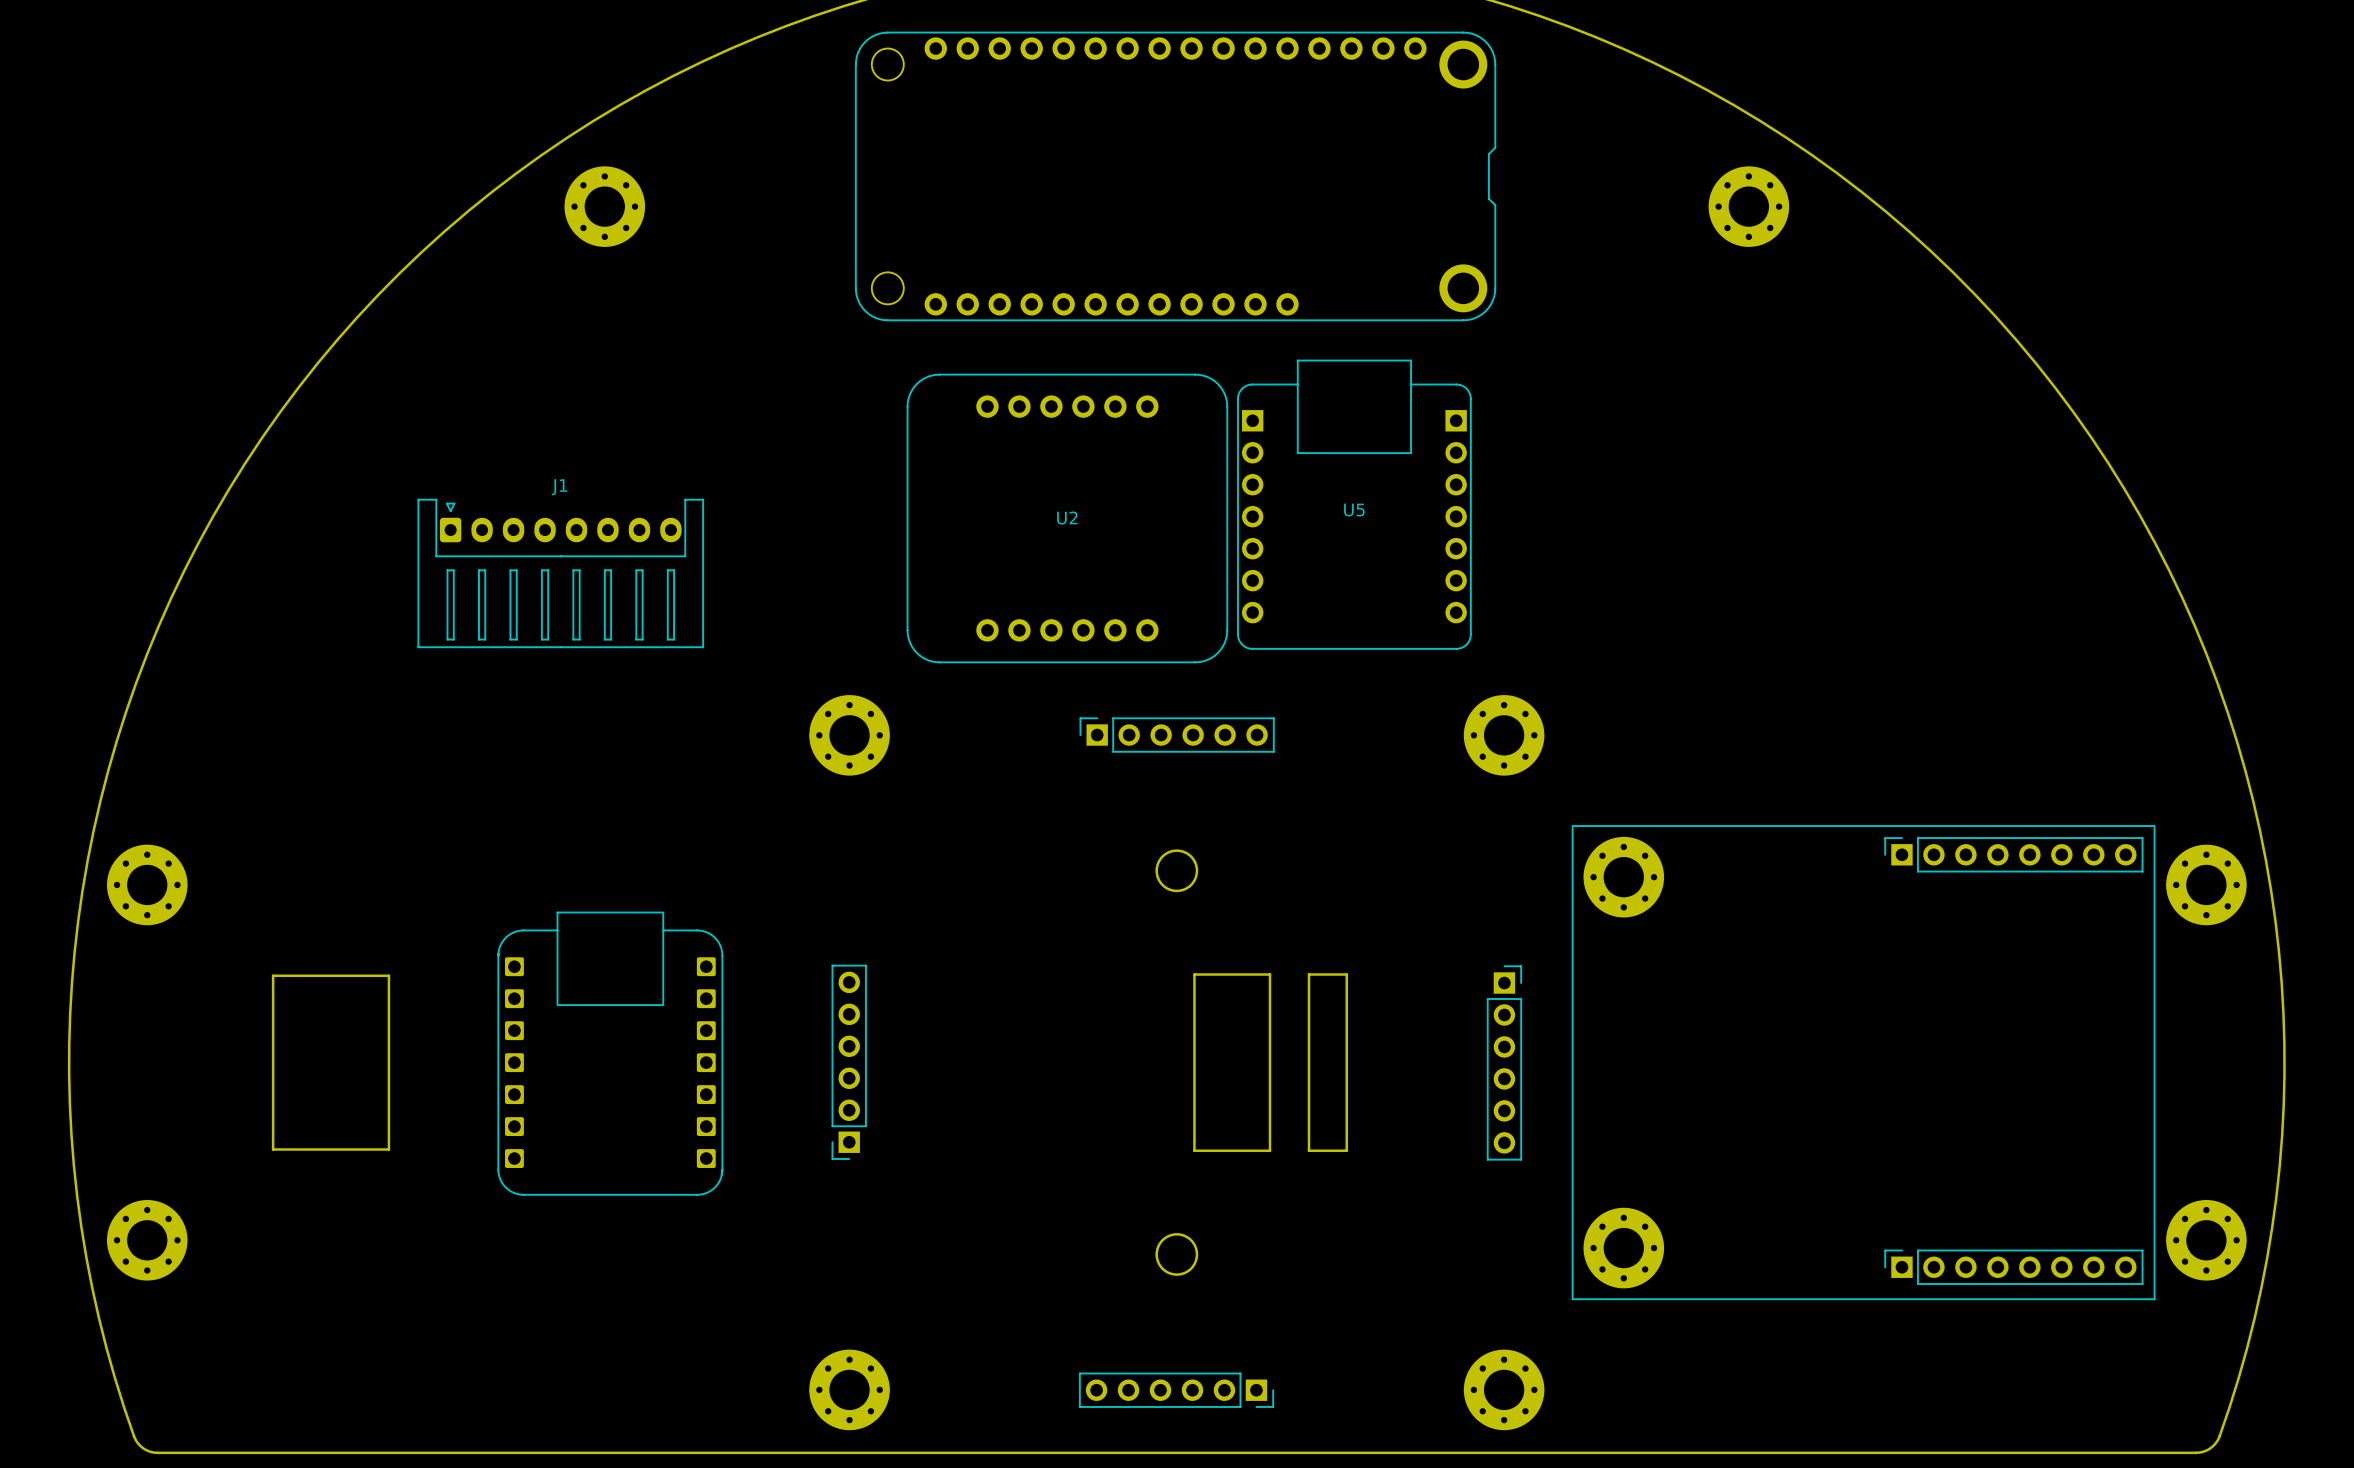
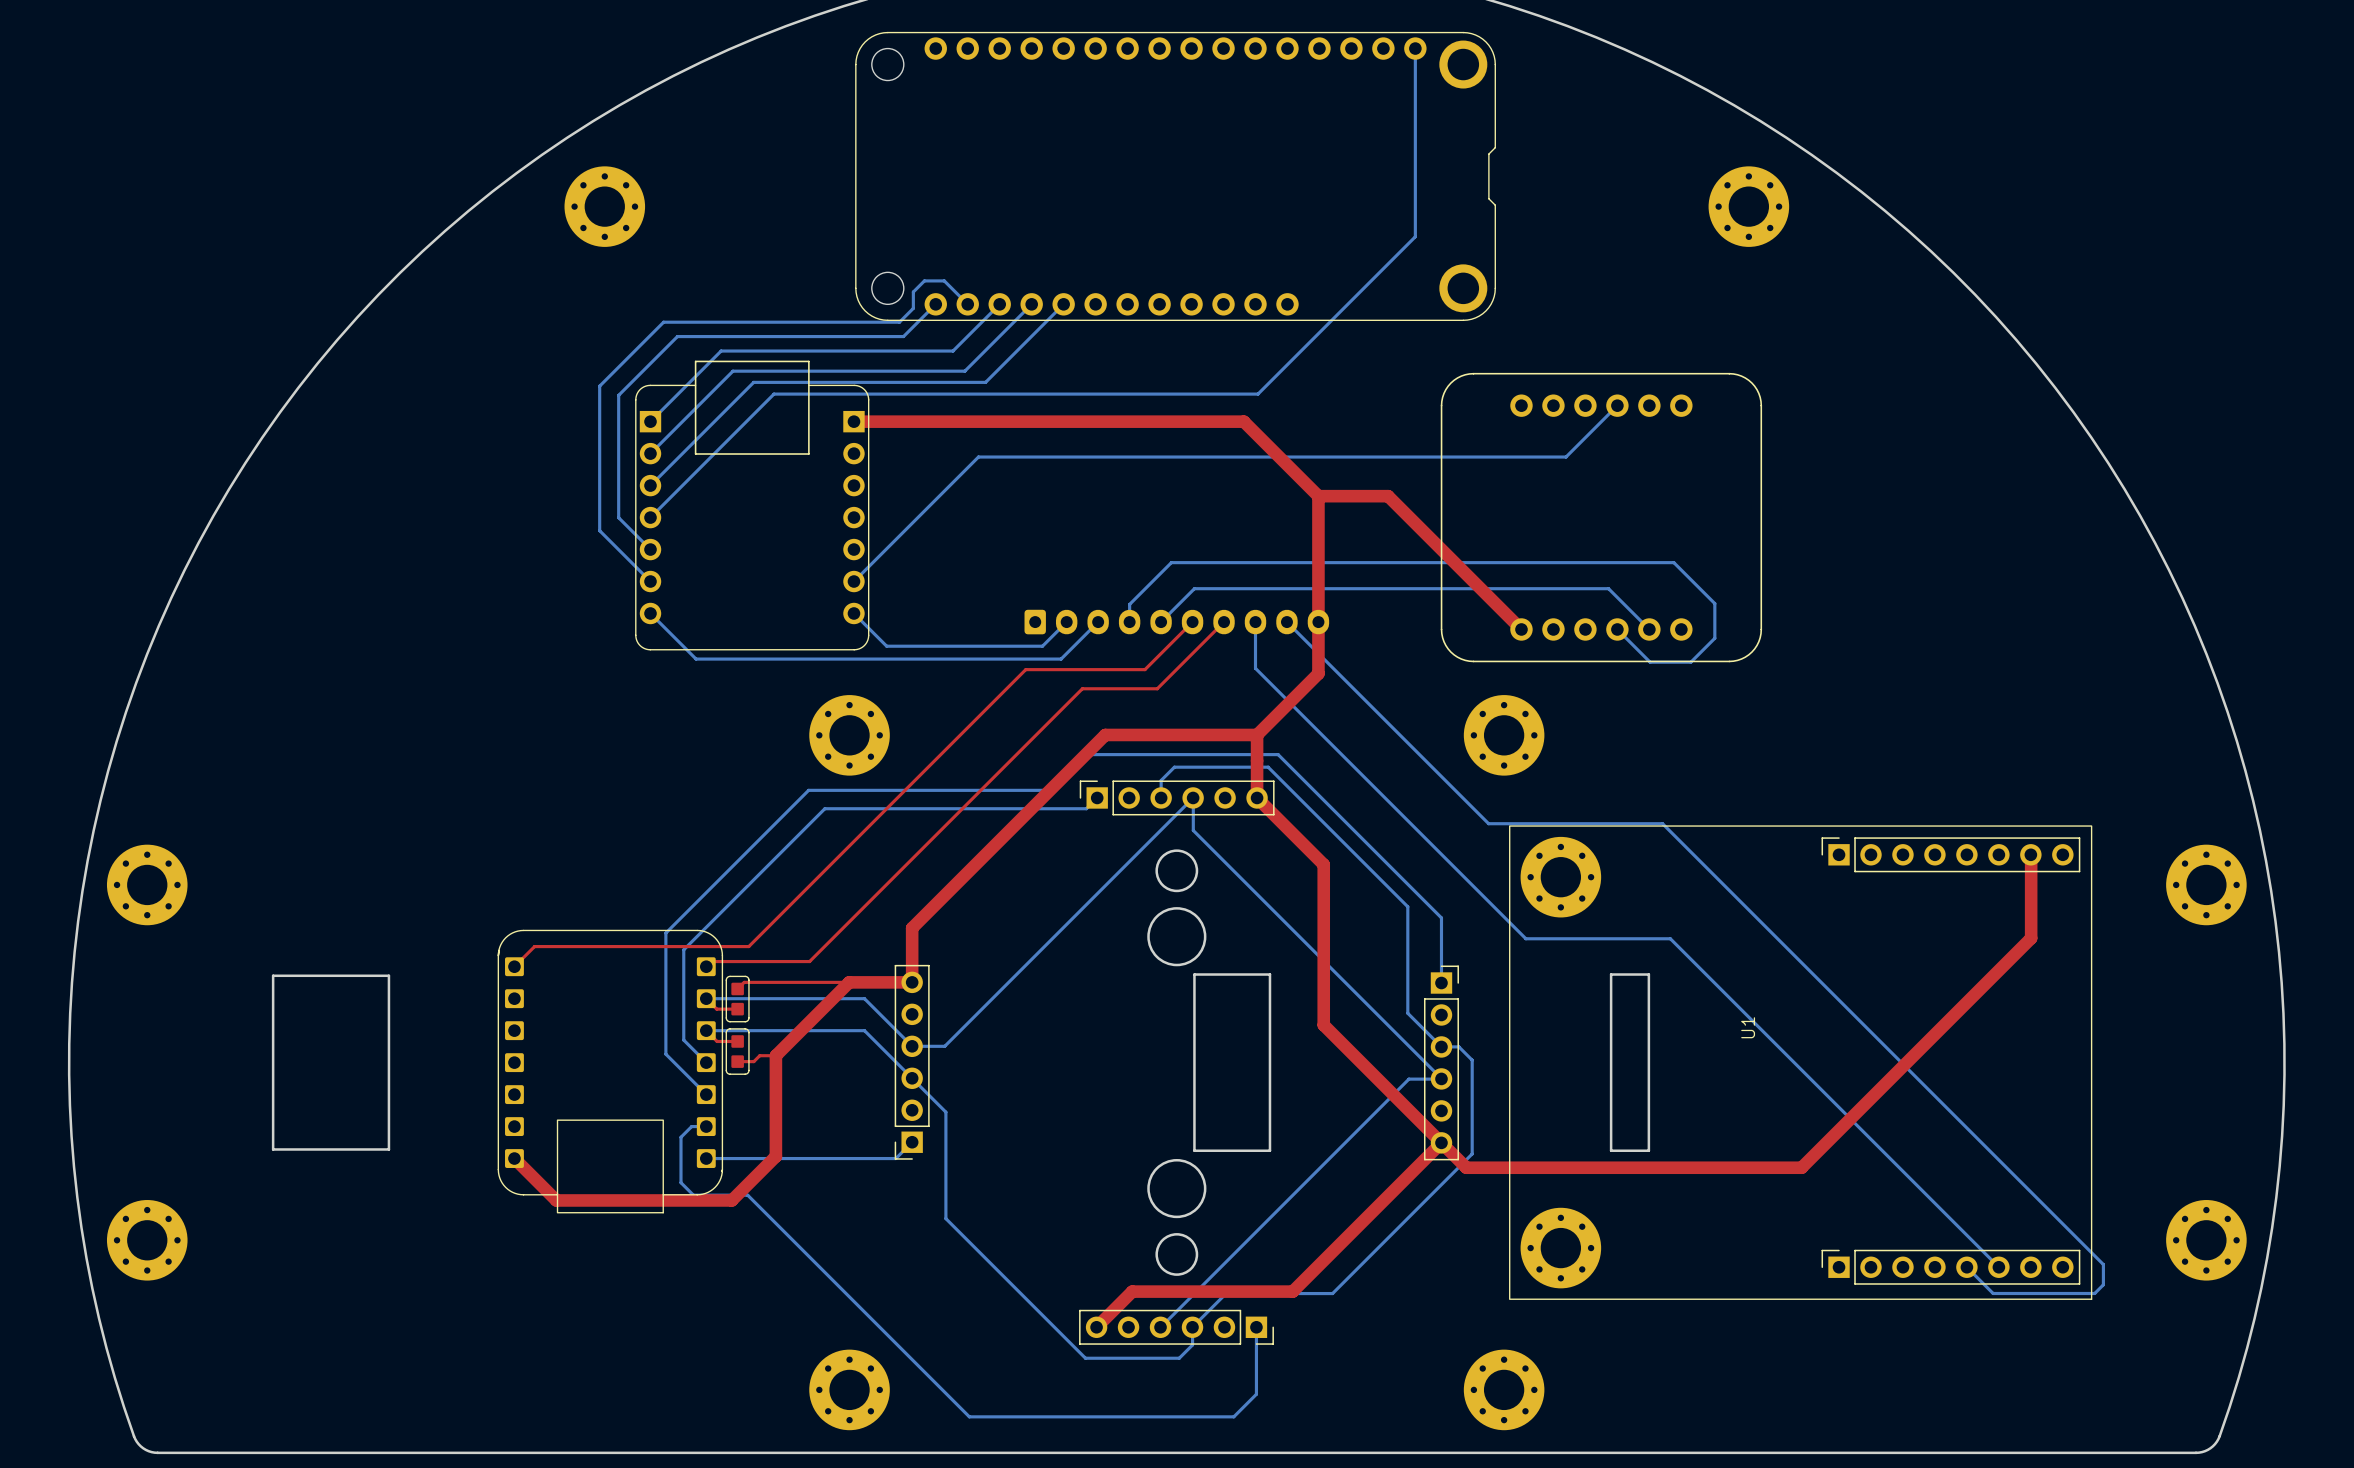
bottom track: none -> (1415, 48) (1415, 236) (1258, 394) (773, 394) (650, 517)
bottom track: none -> (935, 304) (903, 336) (677, 336) (618, 395) (618, 517) (650, 549)
bottom track: none -> (967, 304) (944, 280) (924, 280) (913, 292) (913, 308) (899, 322) (663, 322) (599, 386) (599, 530) (650, 581)
bottom track: none -> (999, 304) (953, 351) (721, 351) (650, 421)
bottom track: none -> (1031, 304) (964, 371) (732, 371) (650, 453)
bottom track: none -> (1063, 304) (985, 382) (753, 382) (650, 485)
bottom track: none -> (1617, 405) (1566, 457) (978, 457) (853, 581)
top track: none -> (853, 421) (1243, 421) (1318, 496)
top track: none -> (1318, 496) (1388, 496) (1521, 629)
top track: none -> (1318, 496) (1318, 673) (1257, 735) (1257, 797) (1323, 864) (1323, 1025) (1466, 1167) (1801, 1167) (2031, 938) (2030, 854)
U5: (1354, 504) -> none
part: none -> (752, 505)
part: none -> (1601, 517)
U2: (1067, 518) -> none
J1: (560, 573) -> none
bottom track: none -> (650, 613) (696, 659) (1061, 659) (1098, 622)
bottom track: none -> (853, 613) (886, 646) (1042, 646) (1066, 622)
bottom track: none -> (1129, 622) (1129, 604) (1171, 562) (1673, 562) (1714, 603) (1714, 638) (1690, 662) (1650, 662) (1617, 629)
bottom track: none -> (1161, 622) (1194, 588) (1608, 588) (1649, 629)
part: none -> (1176, 622)
top track: none -> (1192, 622) (1144, 669) (1025, 669) (748, 946) (534, 946) (514, 966)
top track: none -> (1224, 622) (1157, 688) (1082, 688) (809, 961) (711, 961) (706, 966)
bottom track: none -> (1255, 622) (1255, 668) (1525, 938) (1670, 938) (1998, 1267)
bottom track: none -> (1286, 622) (1488, 823) (1662, 823) (2103, 1264) (2103, 1284) (2094, 1293) (1993, 1293) (1966, 1267)
top track: none -> (1257, 734) (1105, 734) (912, 928) (912, 982)
part position: (1177, 735) -> (1177, 797)
bottom track: none -> (1097, 797) (1086, 808) (824, 808) (683, 949) (683, 1040) (706, 1062)
bottom track: none -> (1161, 797) (1161, 780) (1174, 767) (1268, 767) (1407, 906) (1407, 1013) (1441, 1046)
bottom track: none -> (1193, 797) (1193, 830) (1441, 1078)
bottom track: none -> (1193, 797) (944, 1046) (912, 1046) (864, 998) (706, 998)
round board edge: none -> [1147, 907, 1207, 967]
board edge: (1309, 974) (1309, 1150) (1346, 1150) (1346, 974) (1309, 974) -> (1611, 974) (1611, 1150) (1648, 1150) (1648, 974) (1611, 974)
top track: none -> (912, 982) (744, 982) (737, 988)
top track: none -> (912, 982) (849, 982) (775, 1055)
bottom track: none -> (1441, 983) (1441, 917) (1278, 754) (1086, 754) (1050, 790) (808, 790) (665, 933) (665, 1054) (706, 1094)
top track: none -> (706, 998) (716, 1009) (737, 1009)
part: none -> (737, 999)
bottom track: none -> (706, 1030) (864, 1030) (912, 1078)
top track: none -> (706, 1030) (717, 1041) (737, 1041)
bottom track: none -> (1441, 1046) (1458, 1046) (1472, 1060) (1472, 1153) (1332, 1293) (1226, 1293) (1192, 1327)
part: none -> (737, 1051)
part rotation: 0° (610, 1053) -> 180° (610, 1071)
top track: none -> (775, 1055) (759, 1055) (753, 1061) (737, 1061)
top track: none -> (775, 1055) (775, 1156) (731, 1200) (556, 1200) (514, 1158)
part position: (849, 1062) -> (912, 1062)
part position: (1504, 1062) -> (1441, 1062)
U1: none -> (1800, 1062)
part: (1863, 1062) -> none
bottom track: none -> (912, 1078) (945, 1112) (945, 1218) (1085, 1358) (1179, 1358) (1192, 1344) (1192, 1327)
bottom track: none -> (1441, 1079) (1408, 1079) (1160, 1327)
bottom track: none -> (706, 1126) (691, 1126) (680, 1137) (680, 1182) (693, 1195) (747, 1195) (969, 1416) (1233, 1416) (1256, 1394) (1256, 1327)
bottom track: none -> (912, 1142) (895, 1158) (706, 1158)
top track: none -> (1441, 1142) (1292, 1291) (1132, 1291) (1096, 1327)
round board edge: none -> [1147, 1158, 1207, 1219]
part position: (1176, 1390) -> (1176, 1327)

